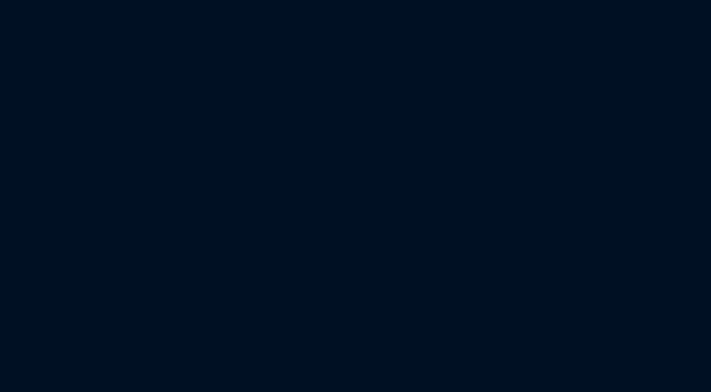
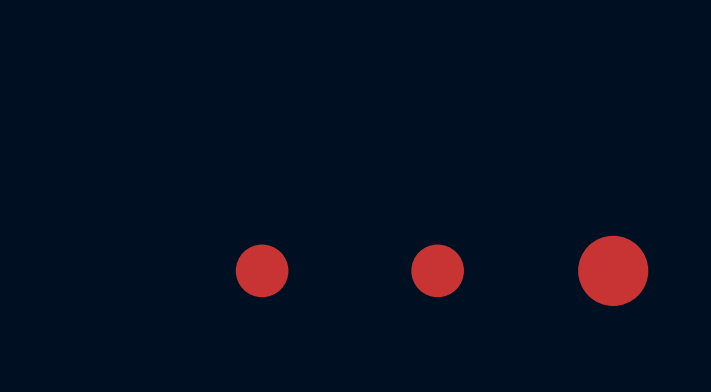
part: none -> (262, 270)
part: none -> (437, 270)
part: none -> (613, 270)

